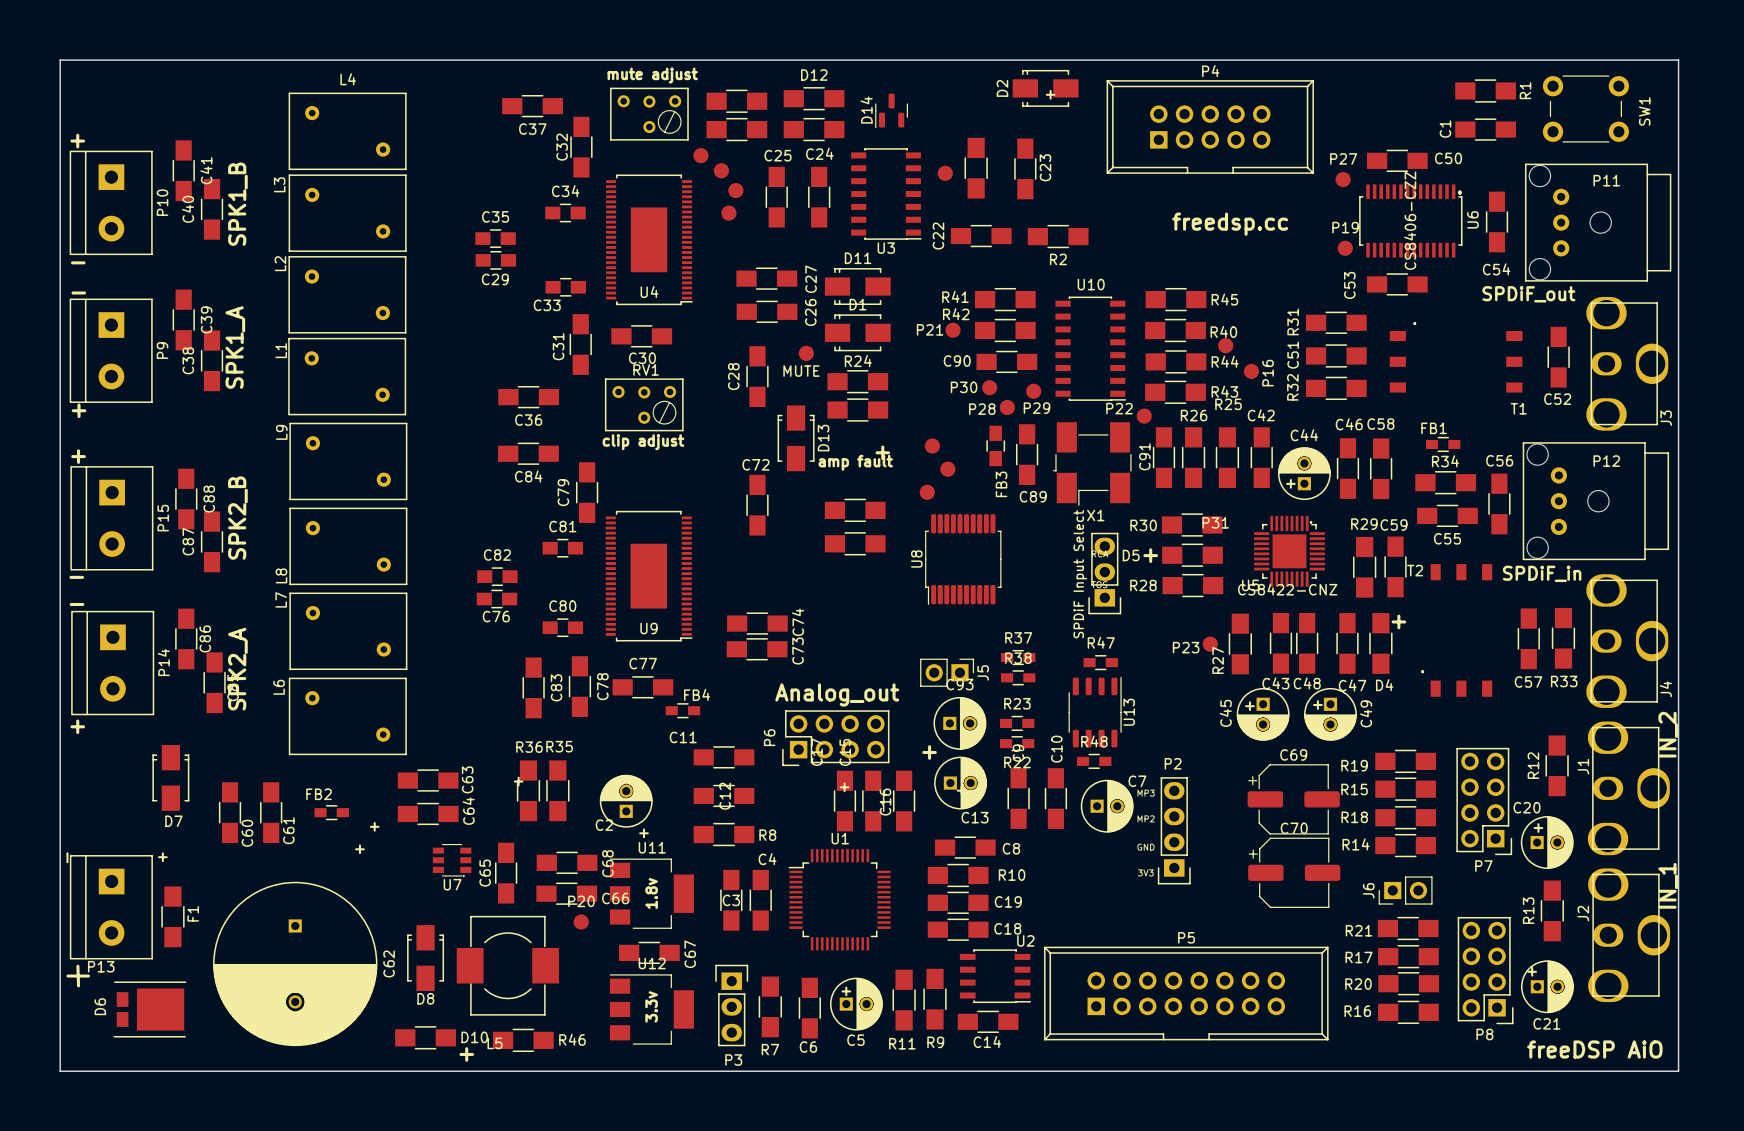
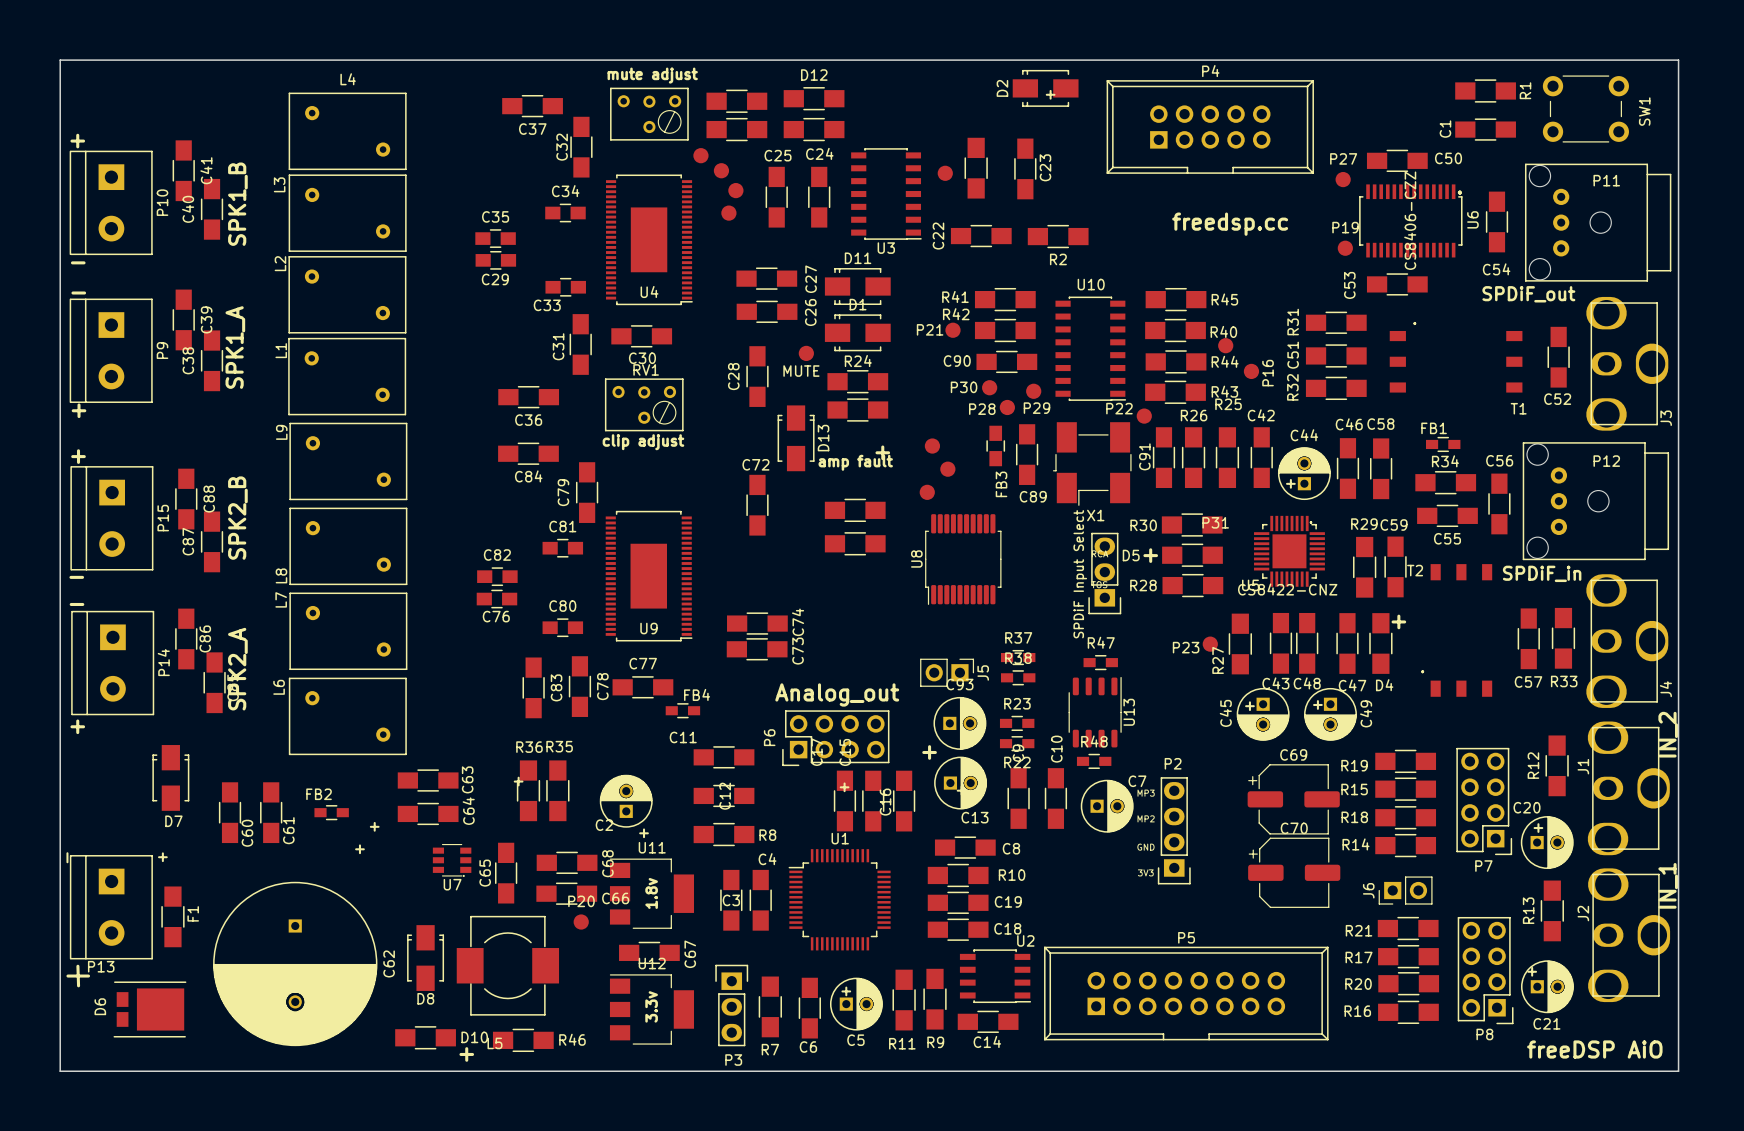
D14: (891, 110) -> none

